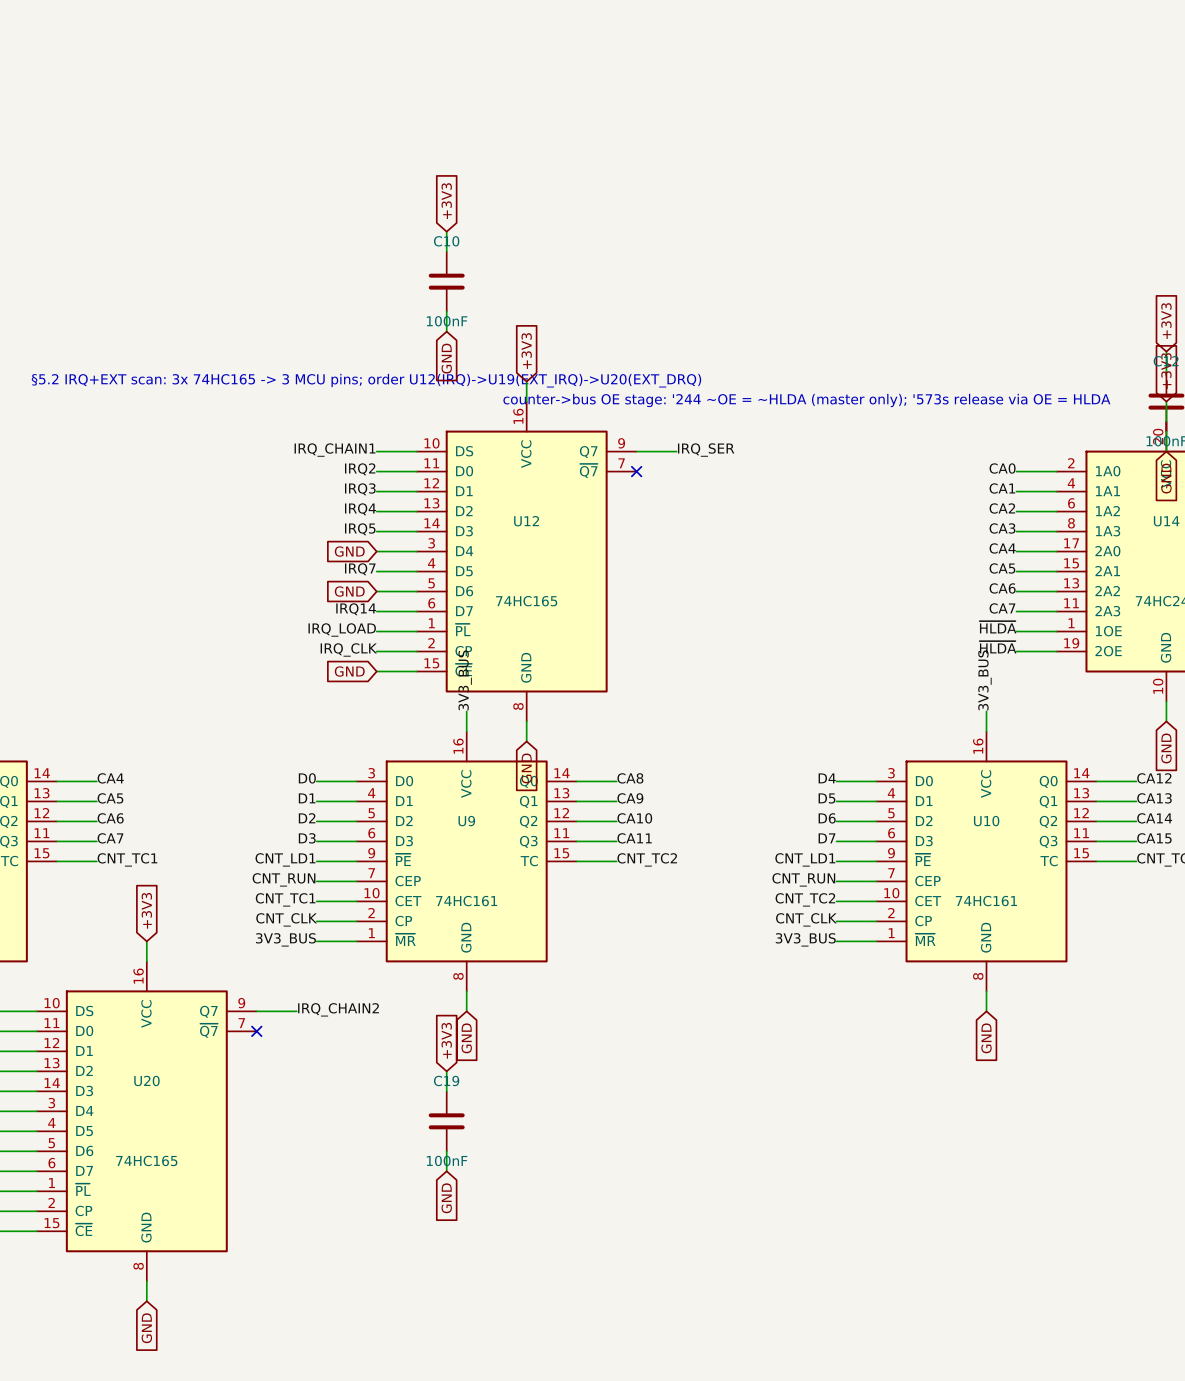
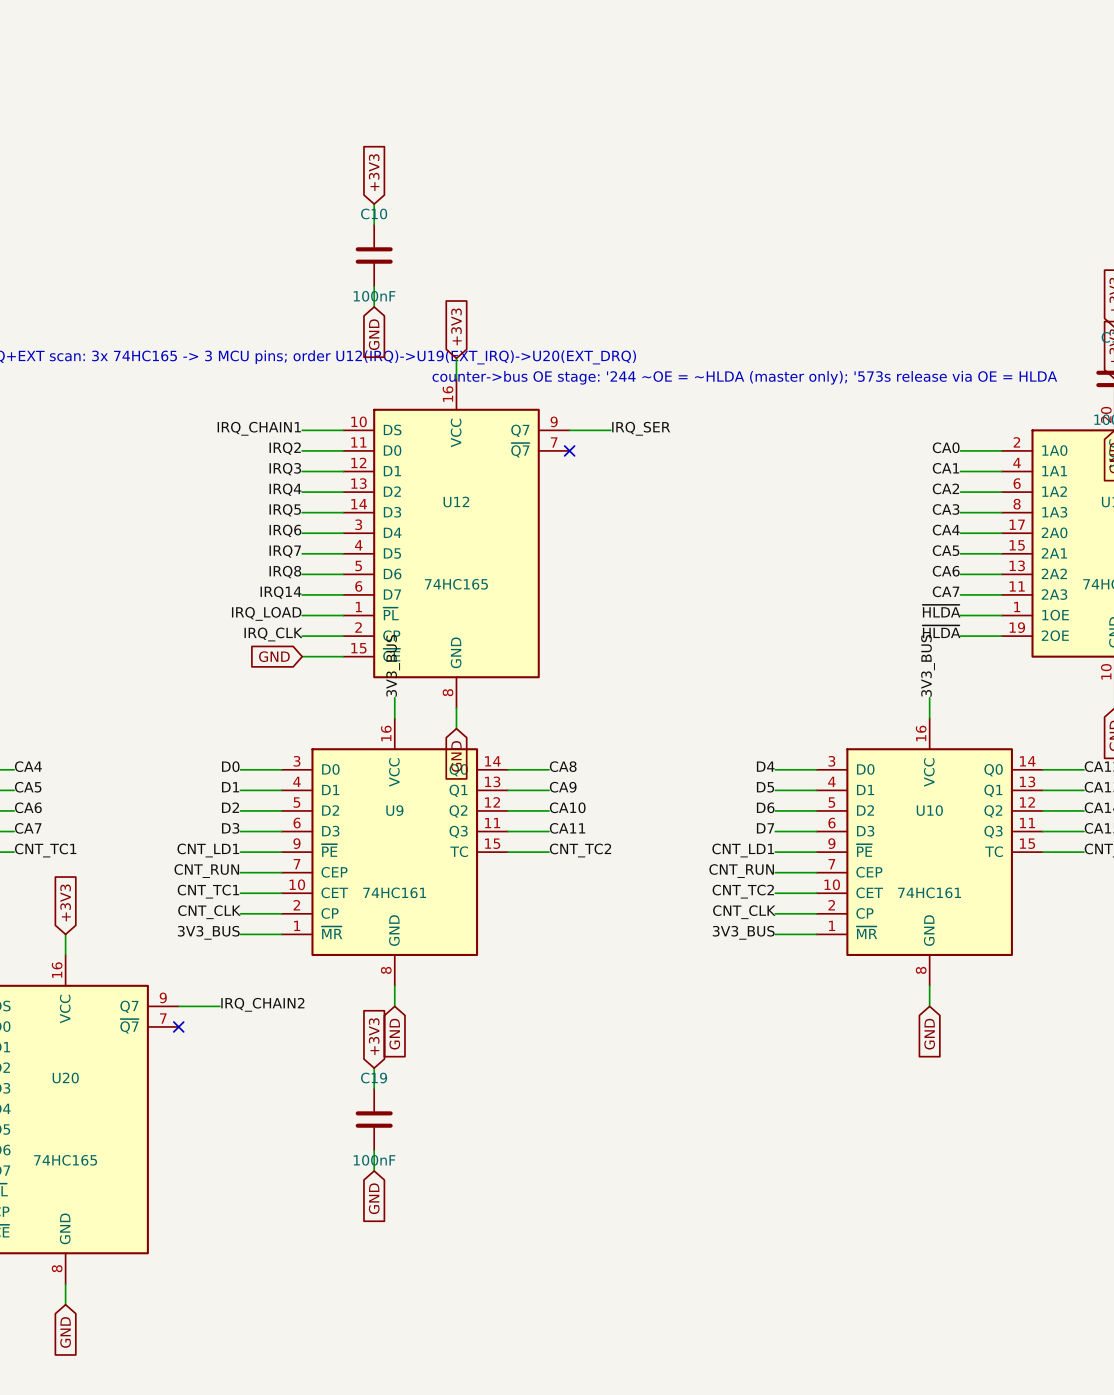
label: none -> IRQ6 (285, 530)
global label: GND (349, 551) -> none
label: none -> IRQ8 (285, 572)
global label: GND (349, 591) -> none

